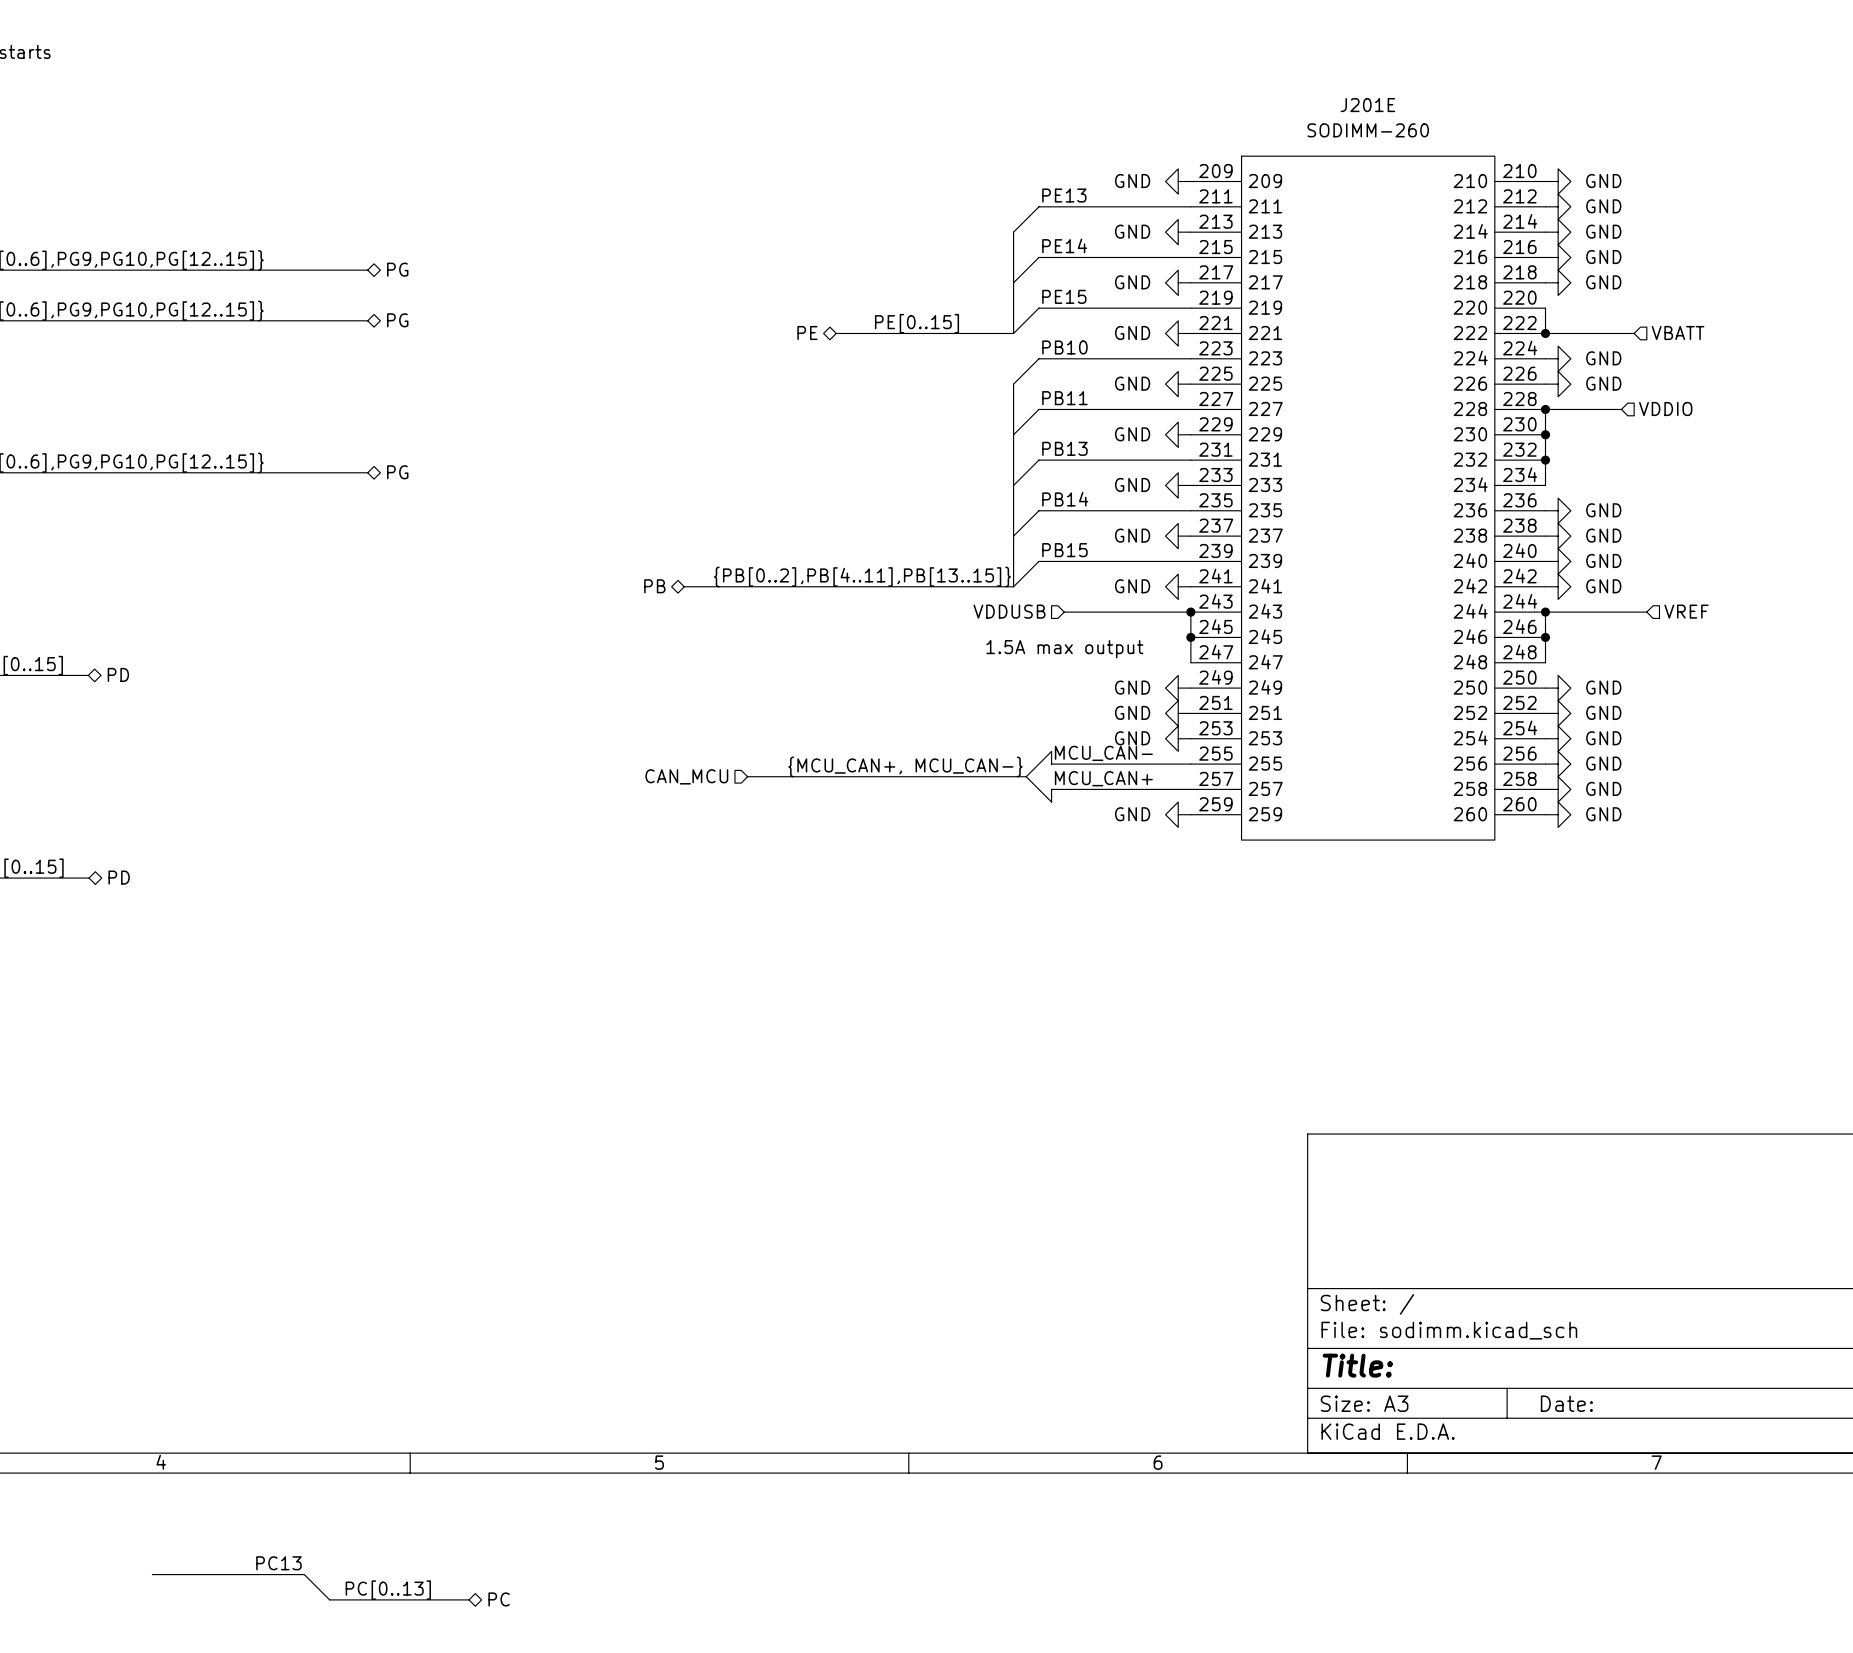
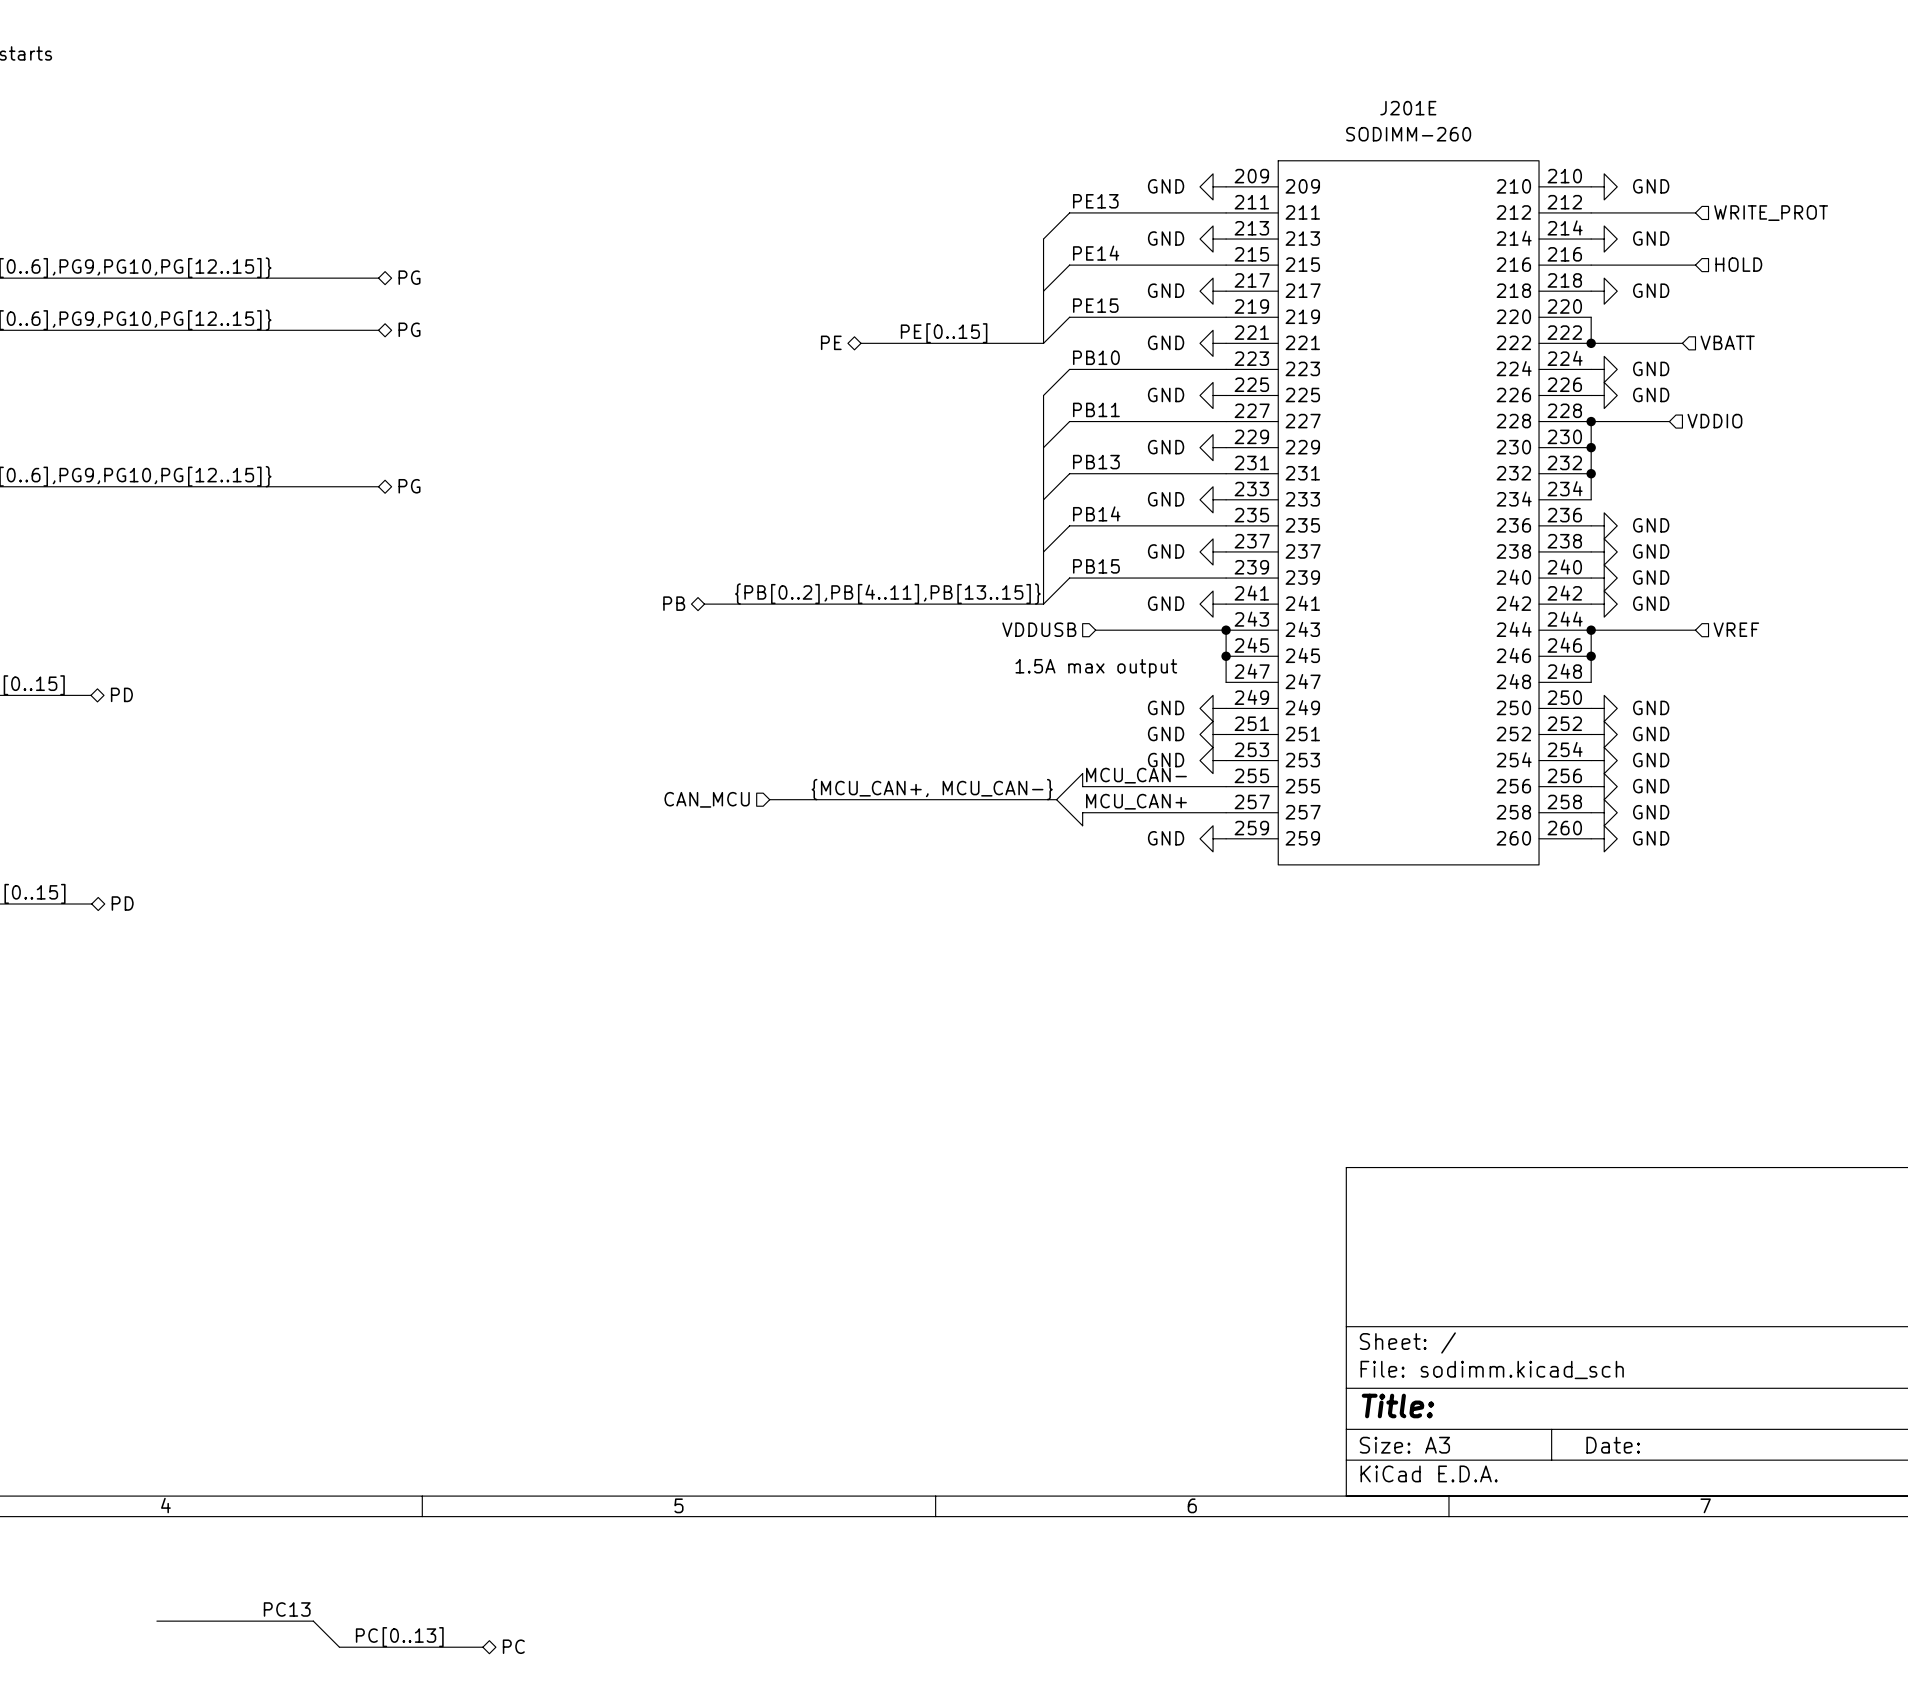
wire: none -> (1591, 212) (1695, 212)
power symbol: GND (1558, 206) -> none
hierarchical label: none -> WRITE_PROT (1771, 213)
wire: none -> (1591, 265) (1695, 265)
power symbol: GND (1558, 257) -> none
hierarchical label: none -> HOLD (1738, 264)

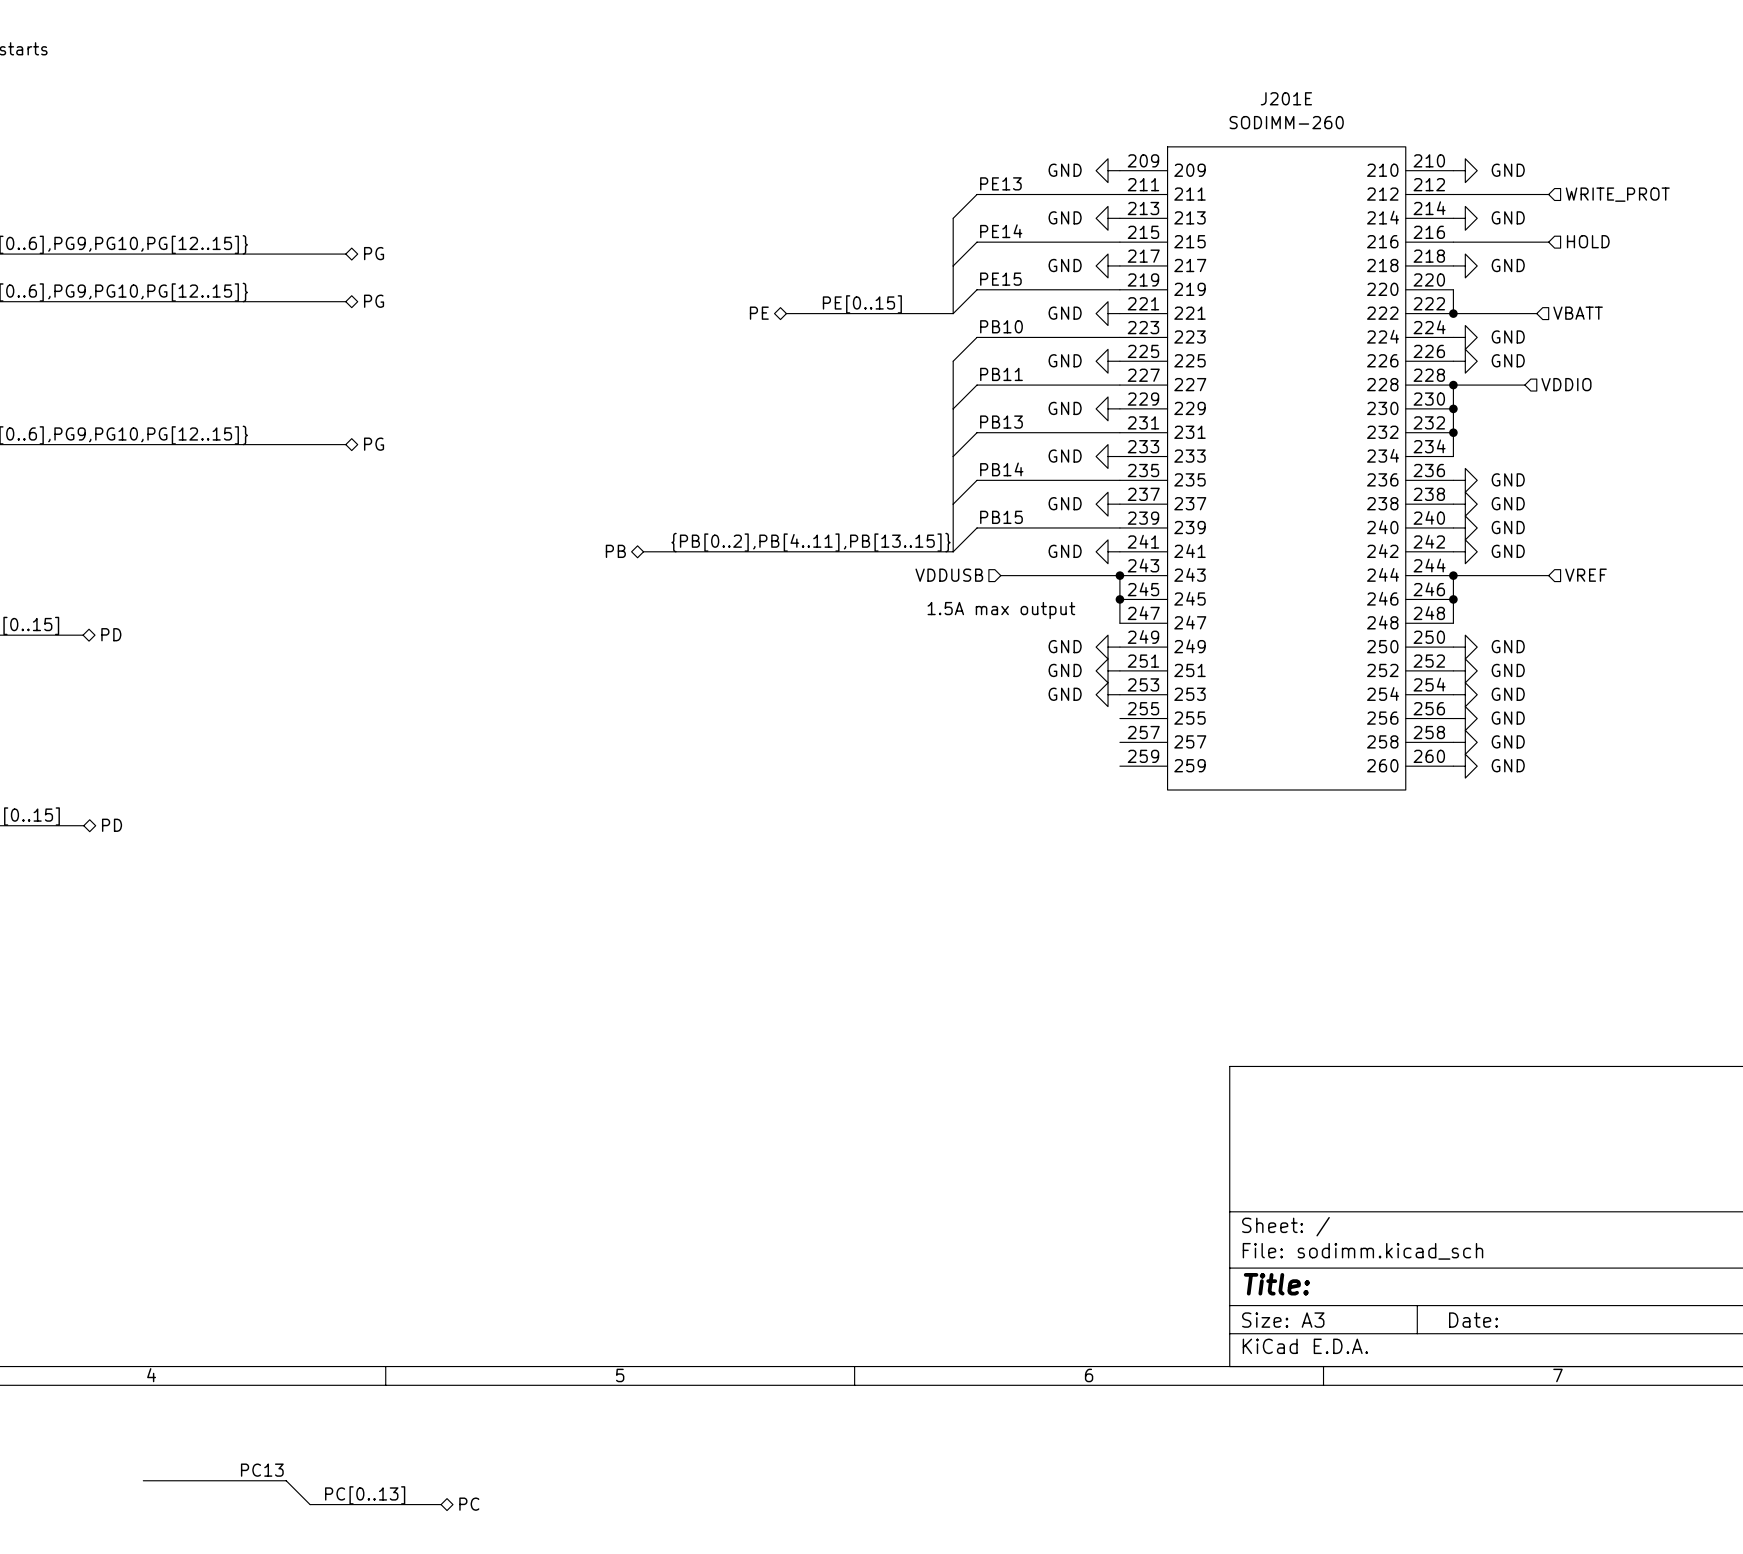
label: MCU_CAN- (1136, 775) -> none
wire: (1226, 786) (1082, 786) (1082, 773) (1056, 799) (1082, 825) (1082, 812) (1226, 812) -> none
label: {MCU_CAN+, MCU_CAN-} (932, 789) -> none
hierarchical label: CAN_MCU (707, 799) -> none
bus: (769, 799) (1056, 799) -> none
label: MCU_CAN+ (1136, 801) -> none
power symbol: GND (1213, 838) -> none

